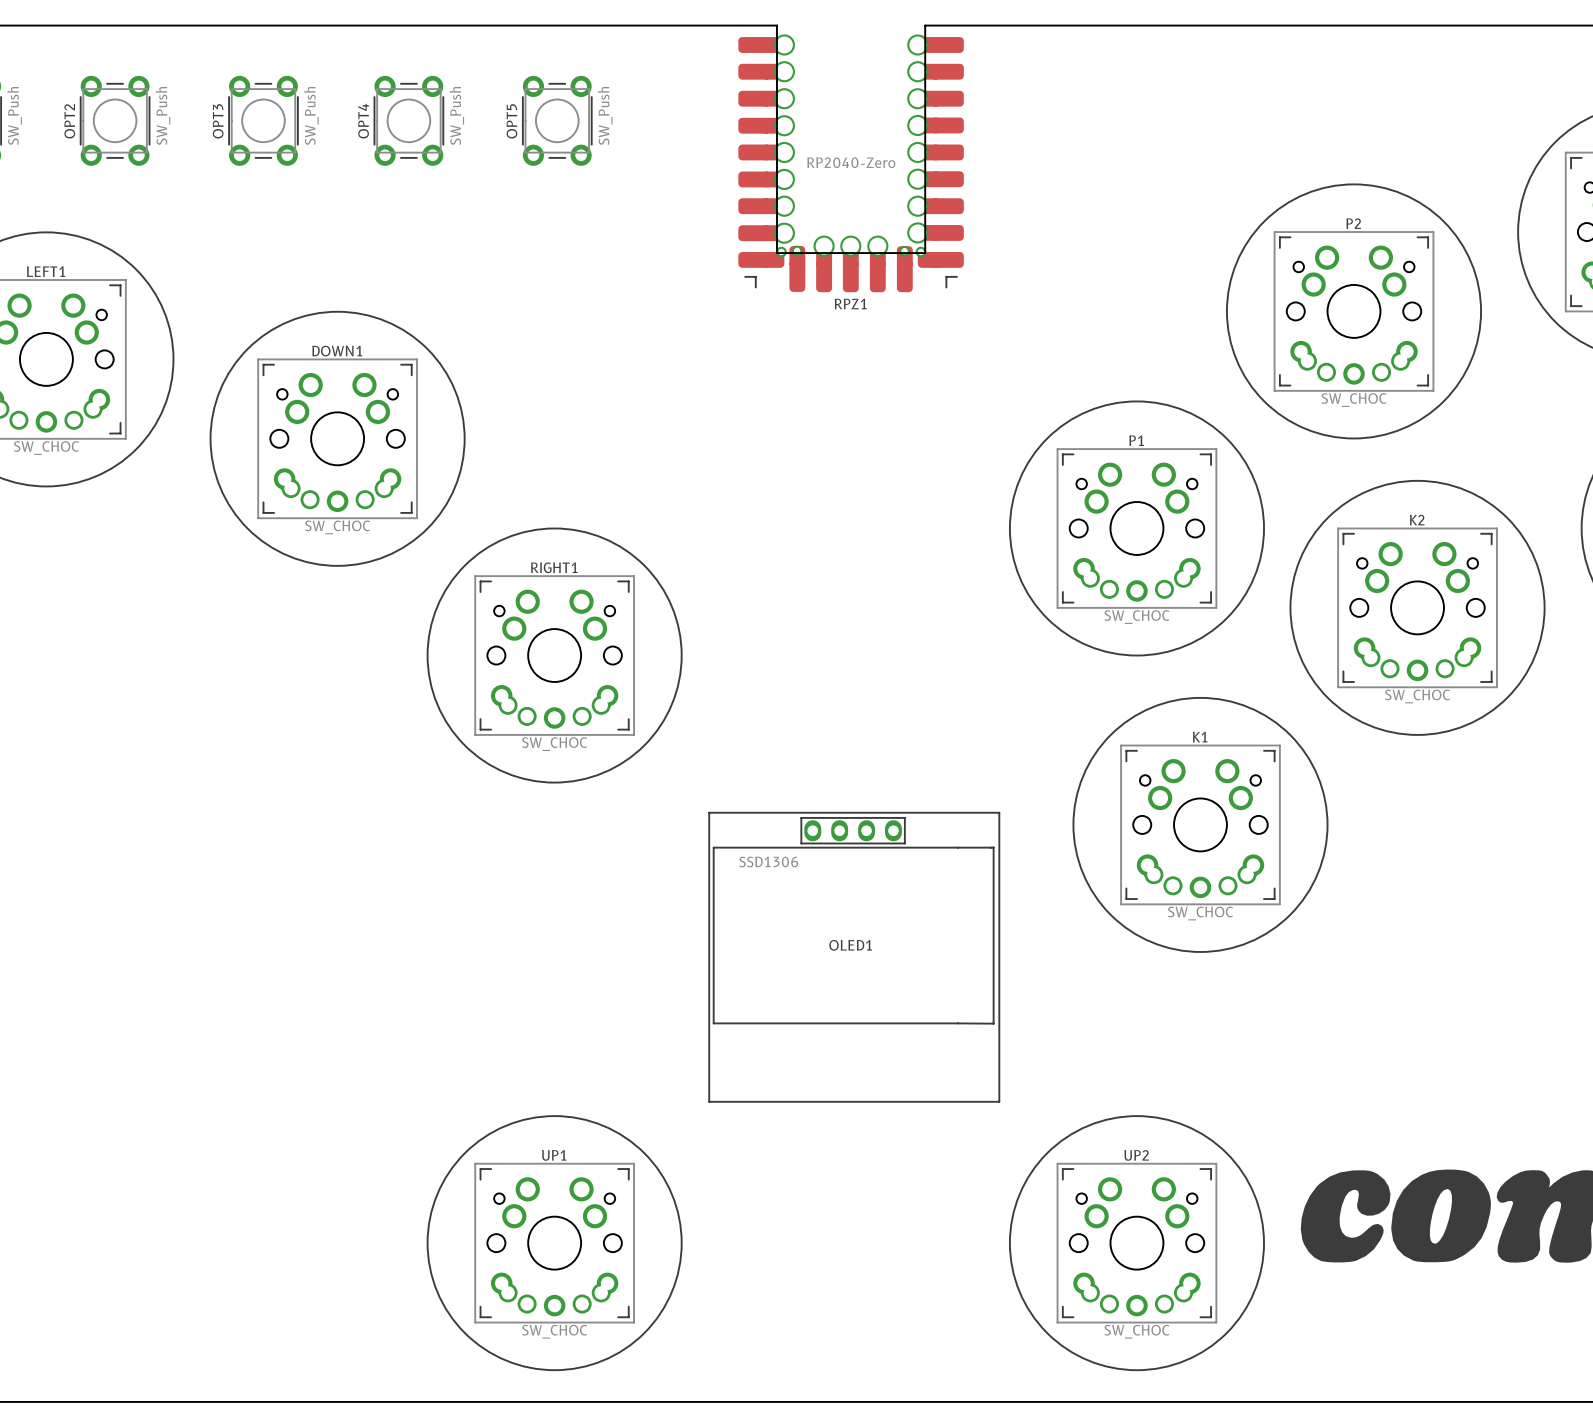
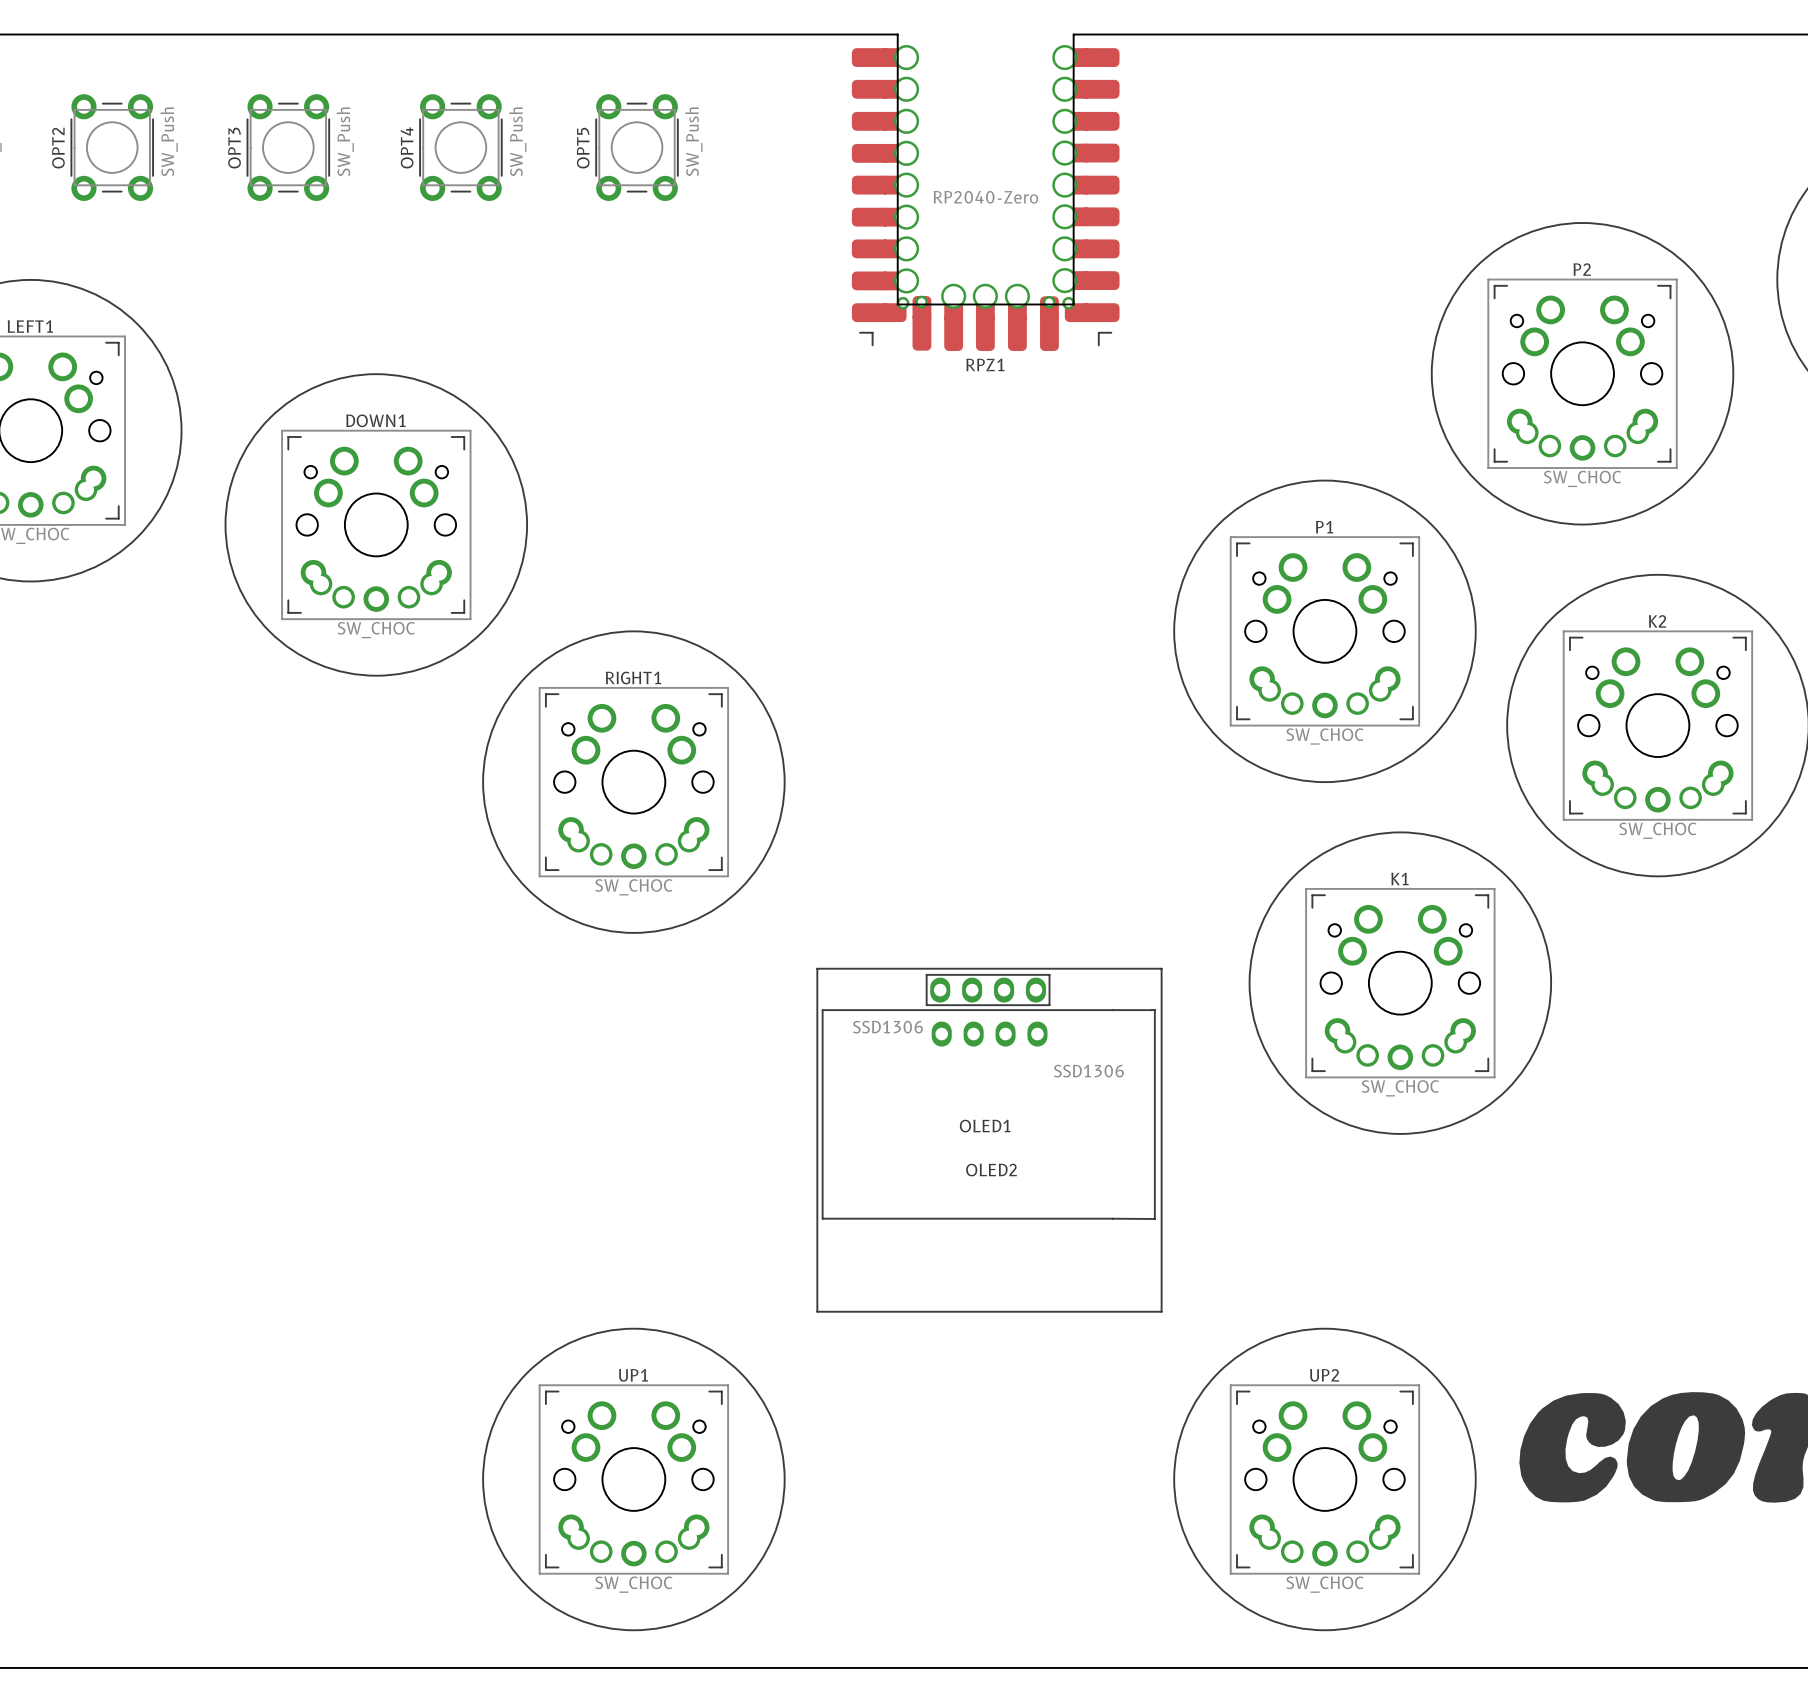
OLED2: none -> SSD1306 (989, 1034)

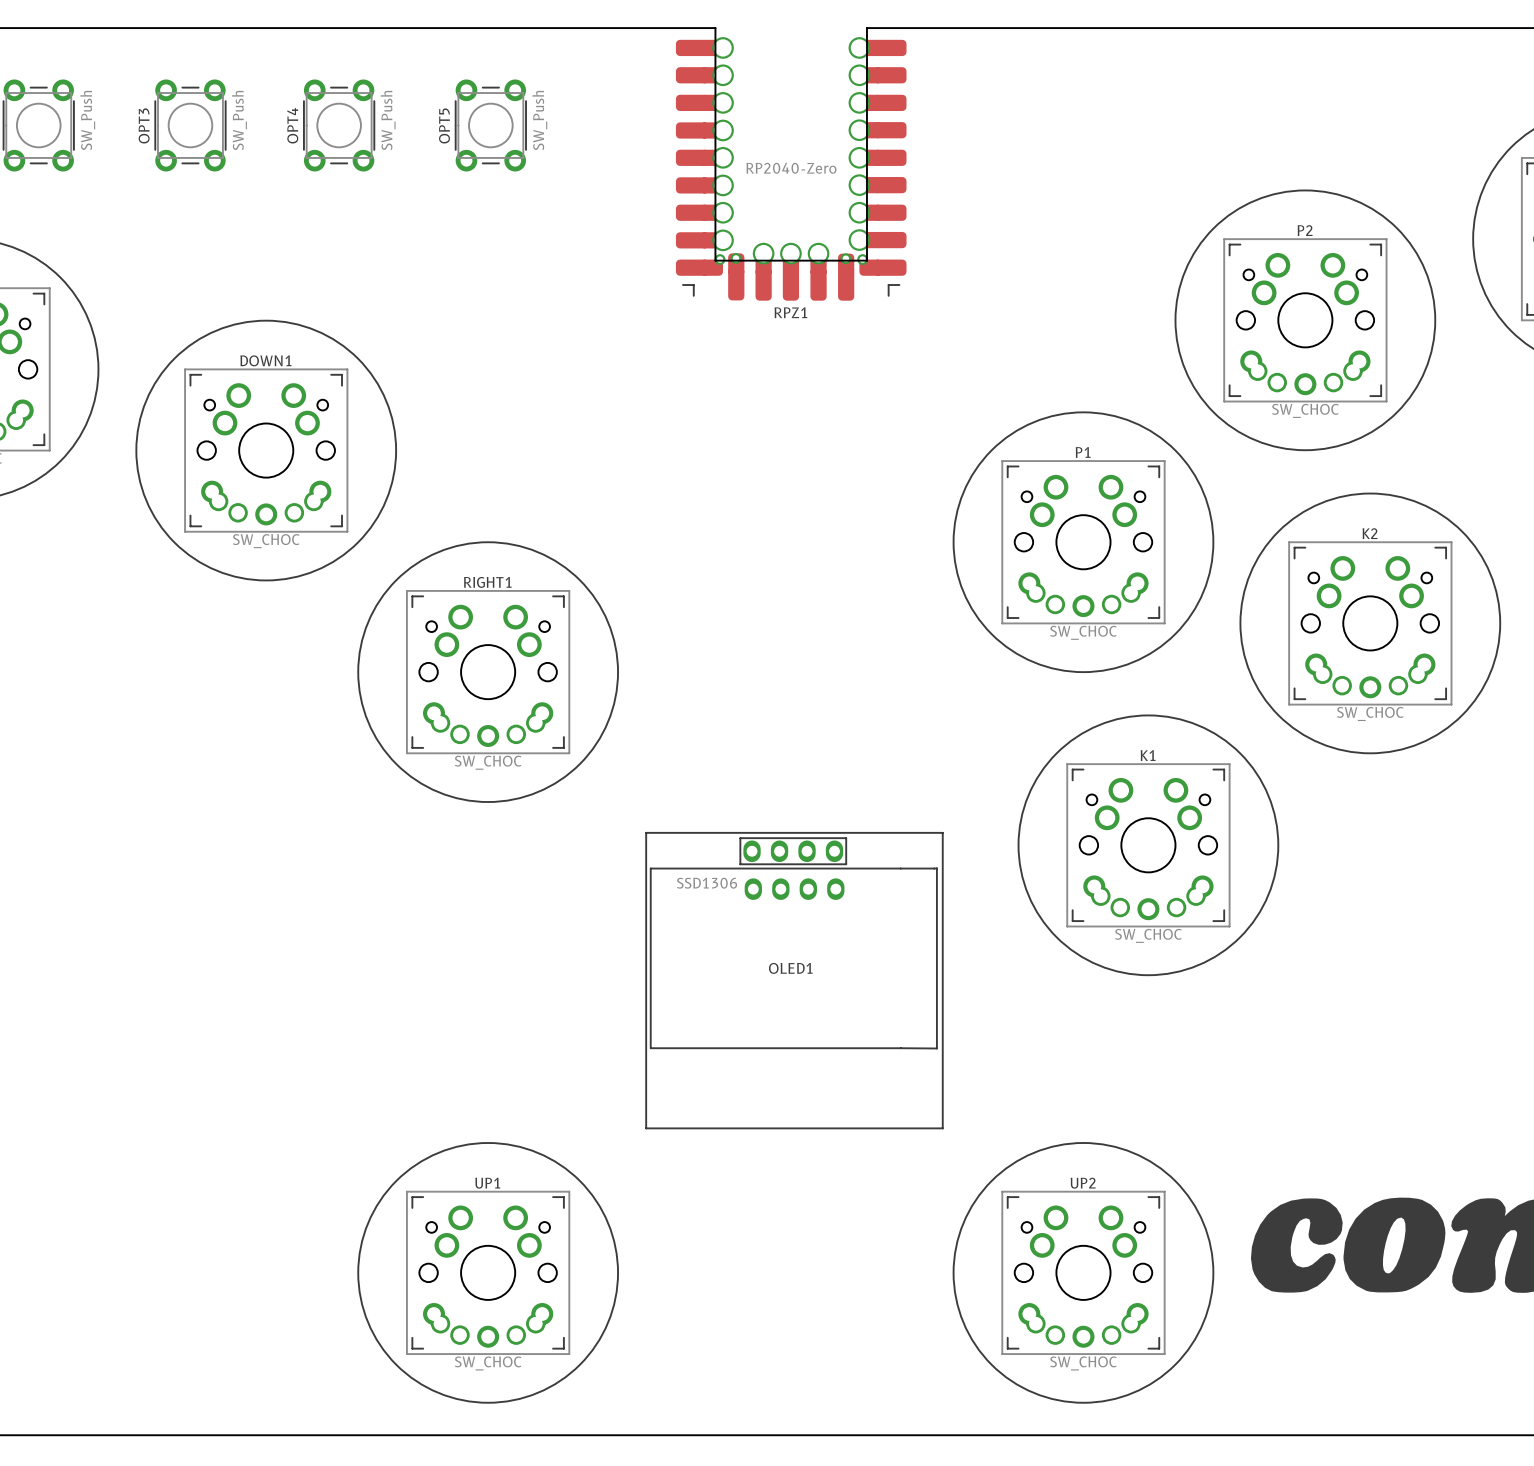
OLED2 value: SSD1306 (1088, 1071) -> none
OLED2 name: OLED2 (991, 1170) -> none

